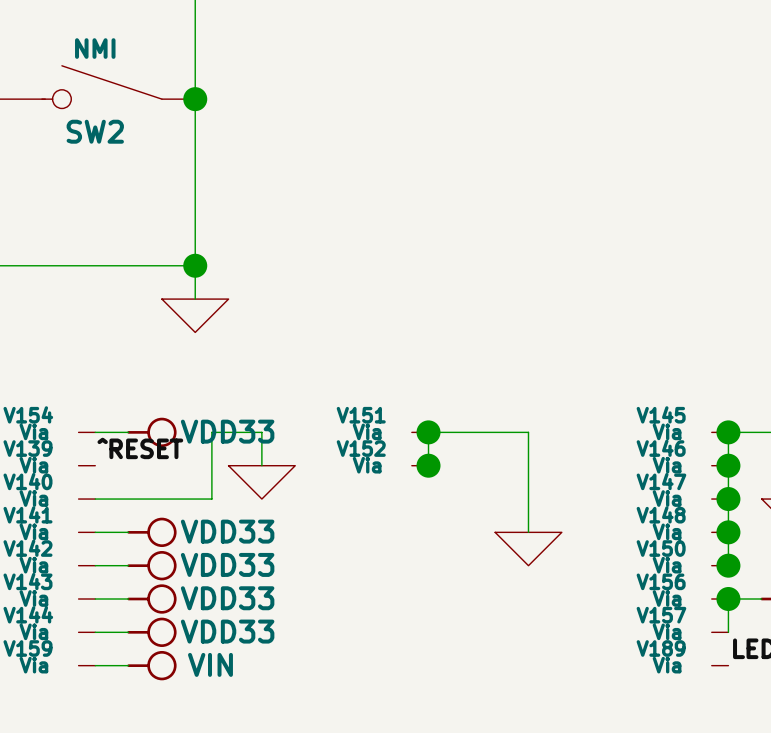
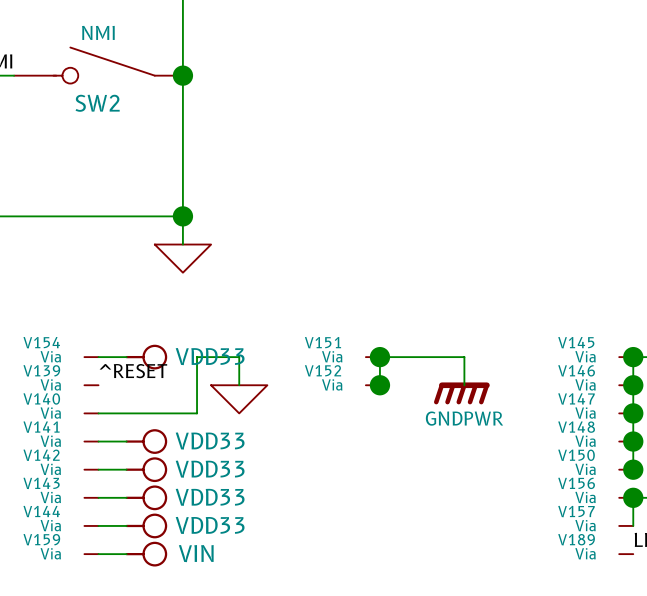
wire: (528, 465) (528, 532) -> none
power symbol: none -> GNDPWR (461, 393)
power symbol: (528, 549) -> none

